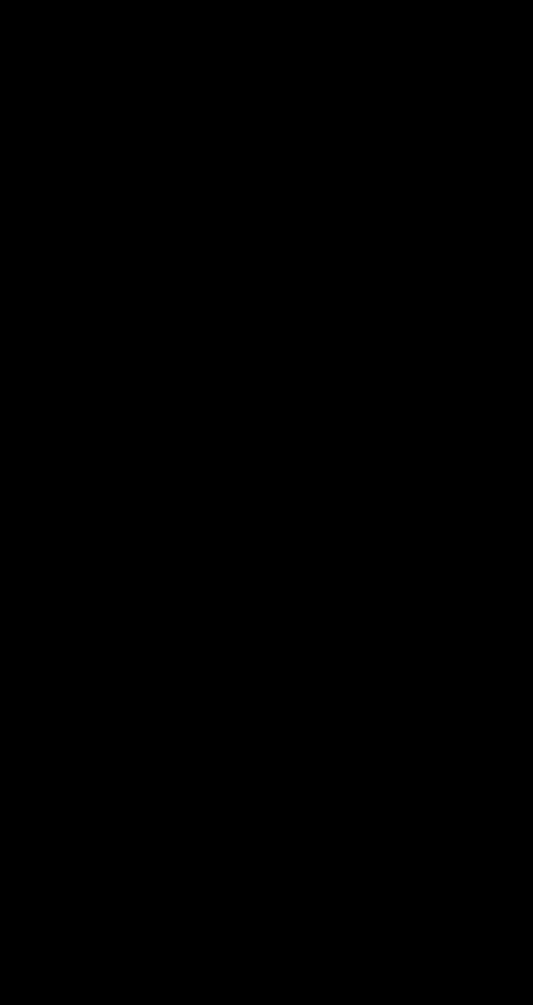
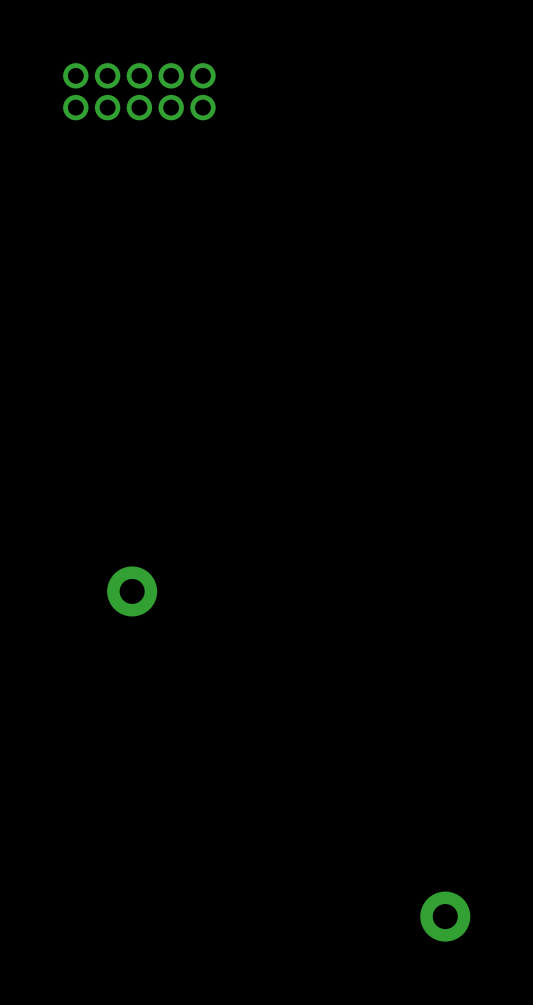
part: none -> (139, 91)
part: none -> (132, 591)
part: none -> (445, 916)

